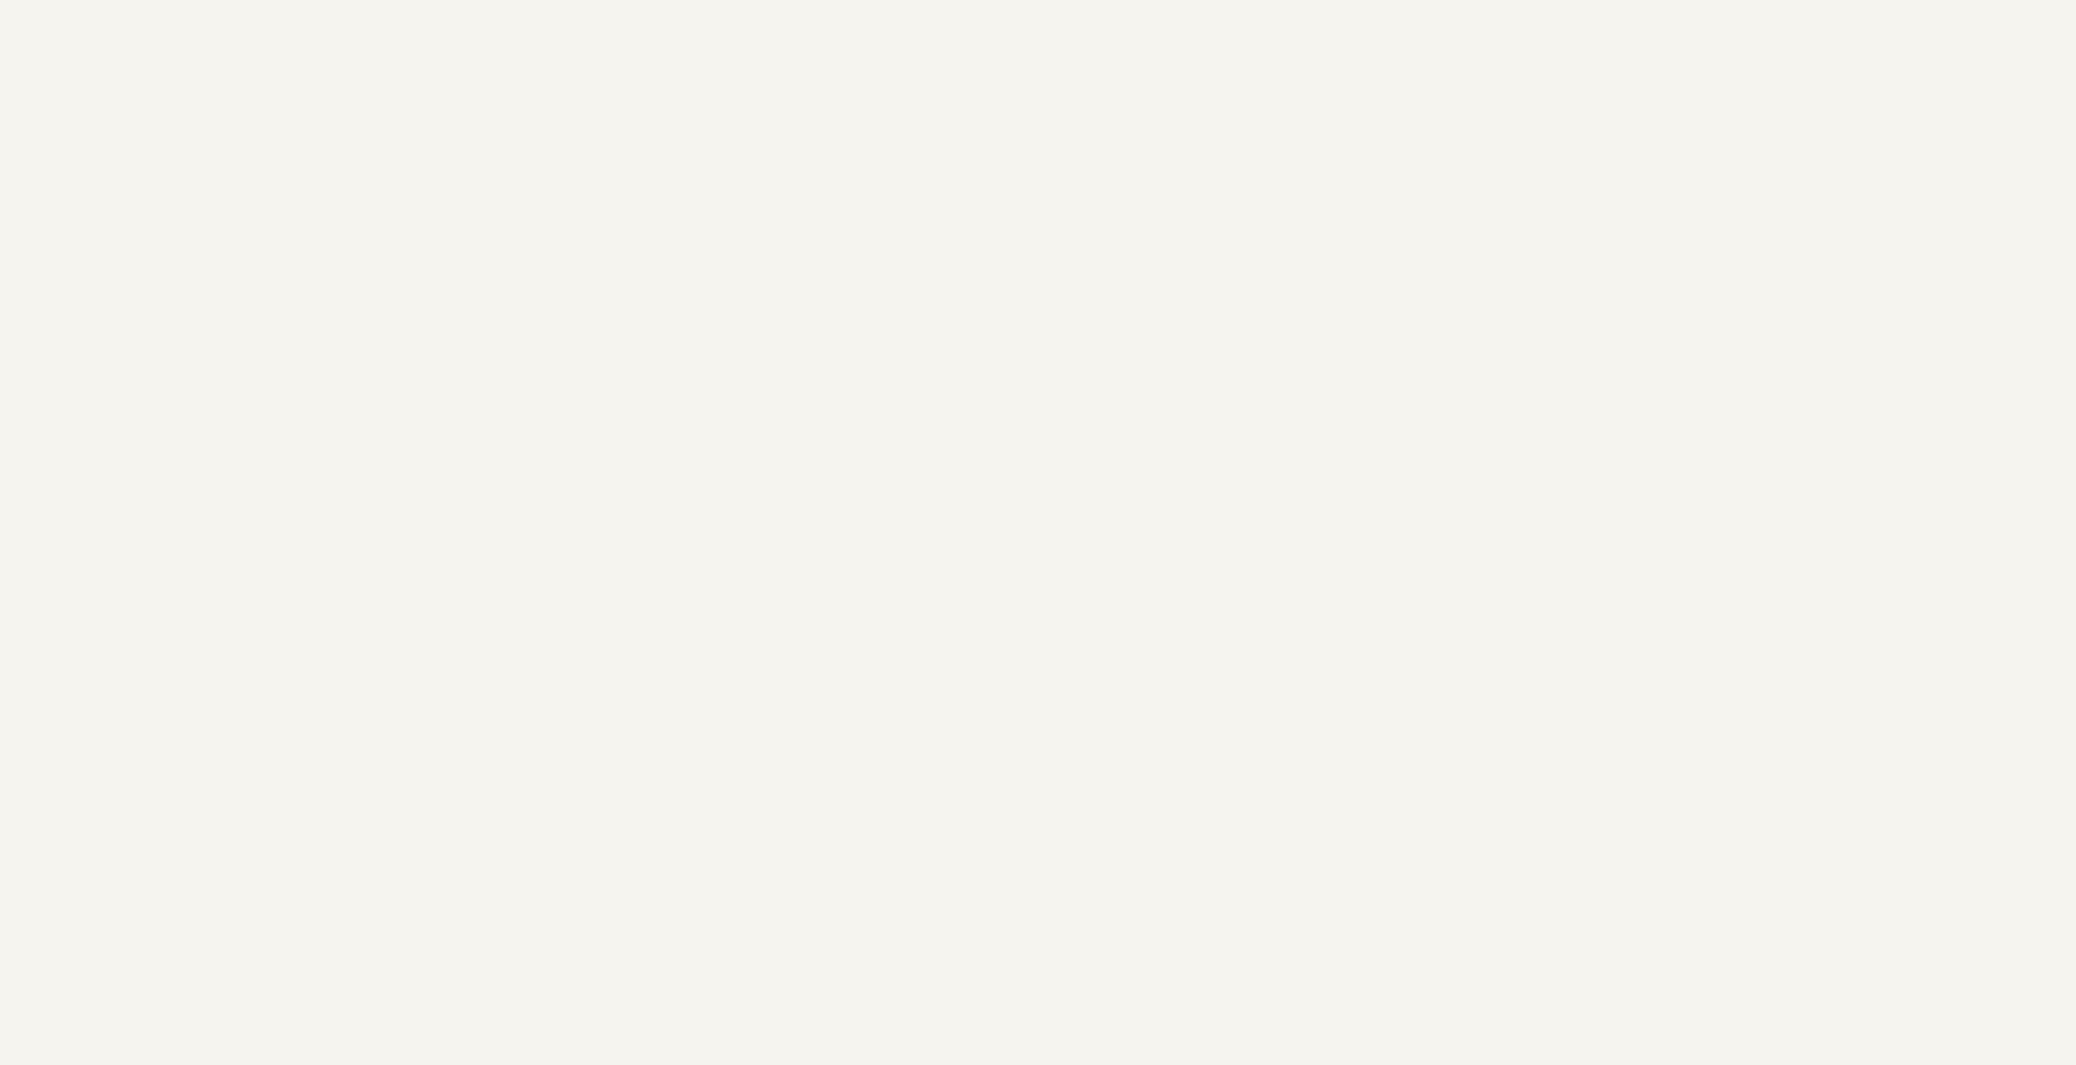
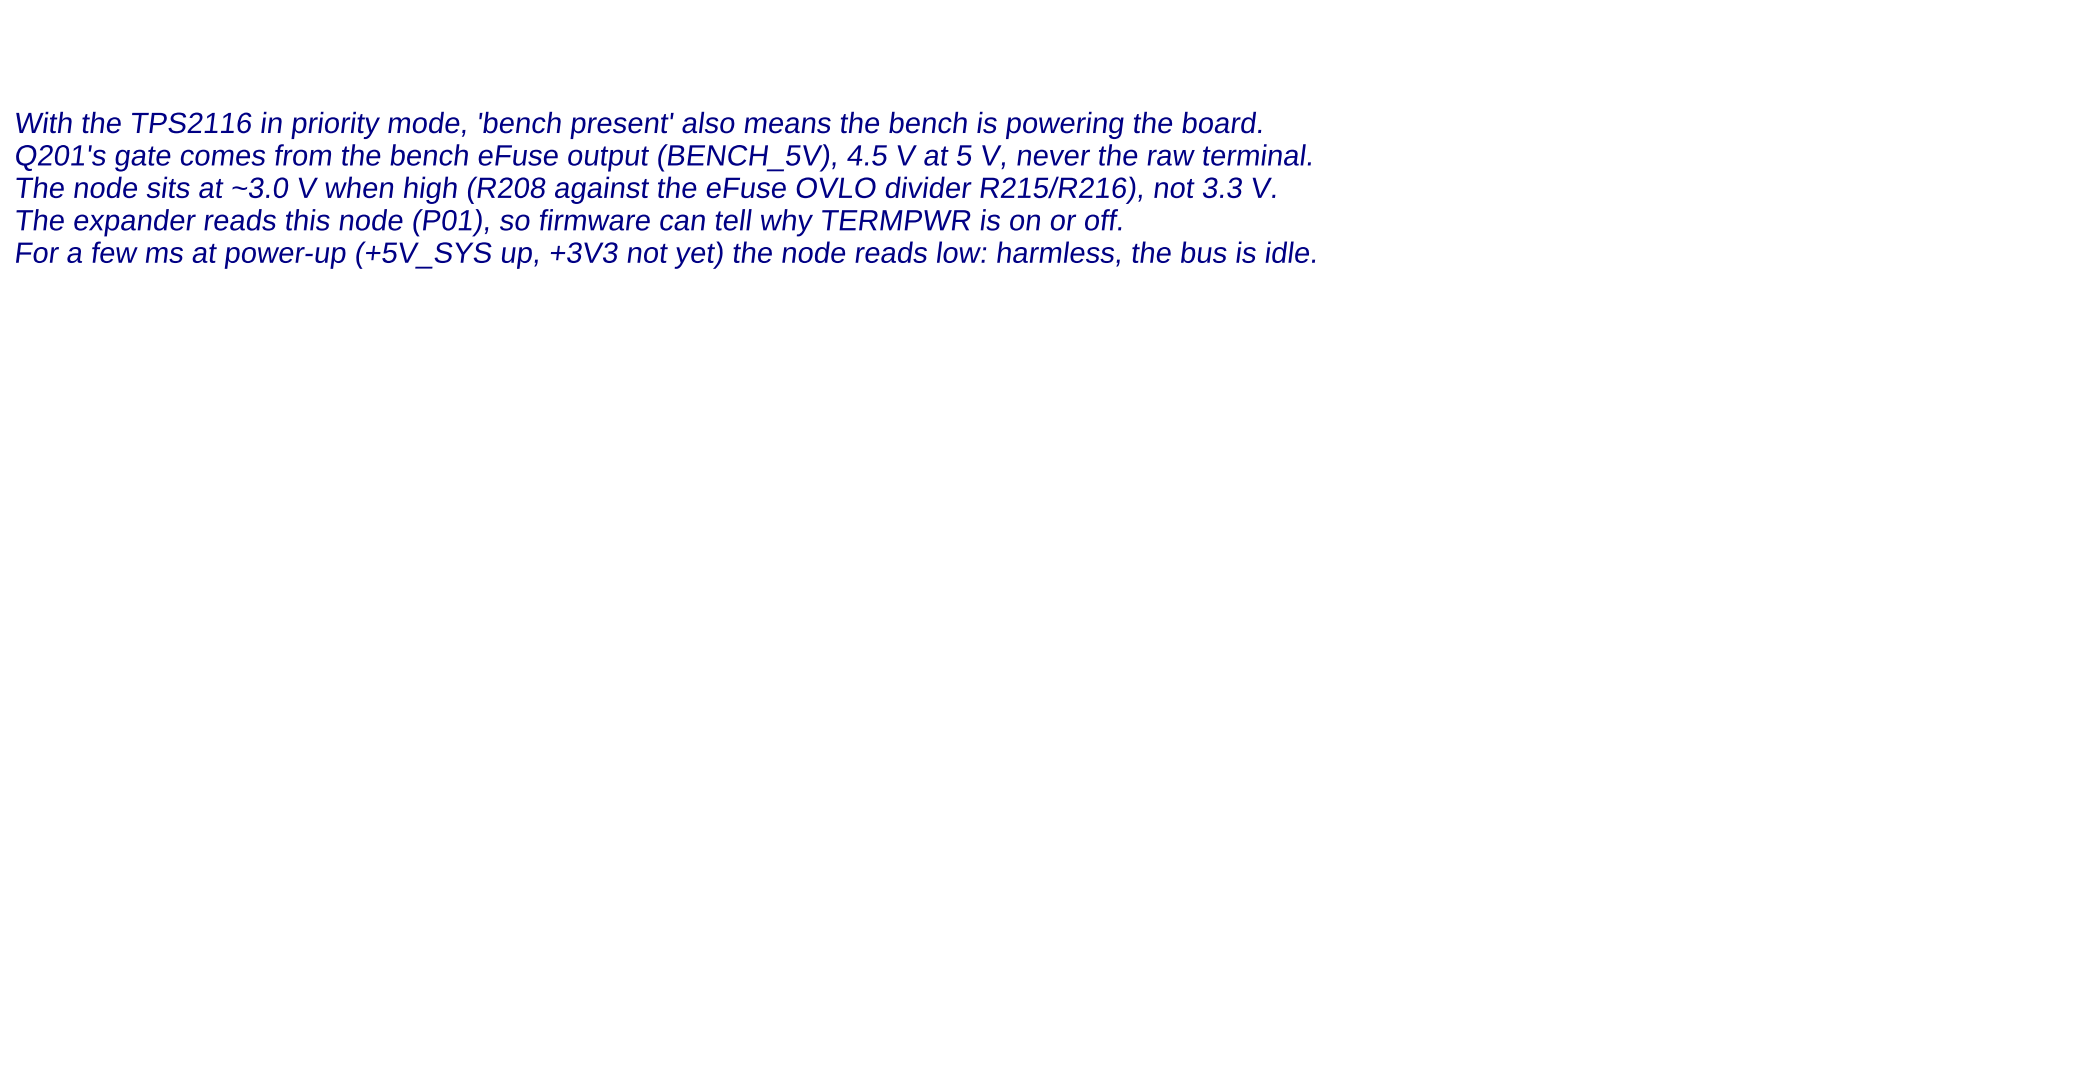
text: none -> With the TPS2116 in priority mode, 'bench present' also means the bench is powering the board. (638, 125)
text: none -> Q201's gate comes from the bench eFuse output (BENCH_5V), 4.5 V at 5 V, never the raw terminal. (663, 157)
text: none -> The node sits at ~3.0 V when high (R208 against the eFuse OVLO divider R215/R216), not 3.3 V. (645, 190)
text: none -> The expander reads this node (P01), so firmware can tell why TERMPWR is on or off. (568, 222)
text: none -> For a few ms at power-up (+5V_SYS up, +3V3 not yet) the node reads low: harmless, the bus is idle. (665, 255)

